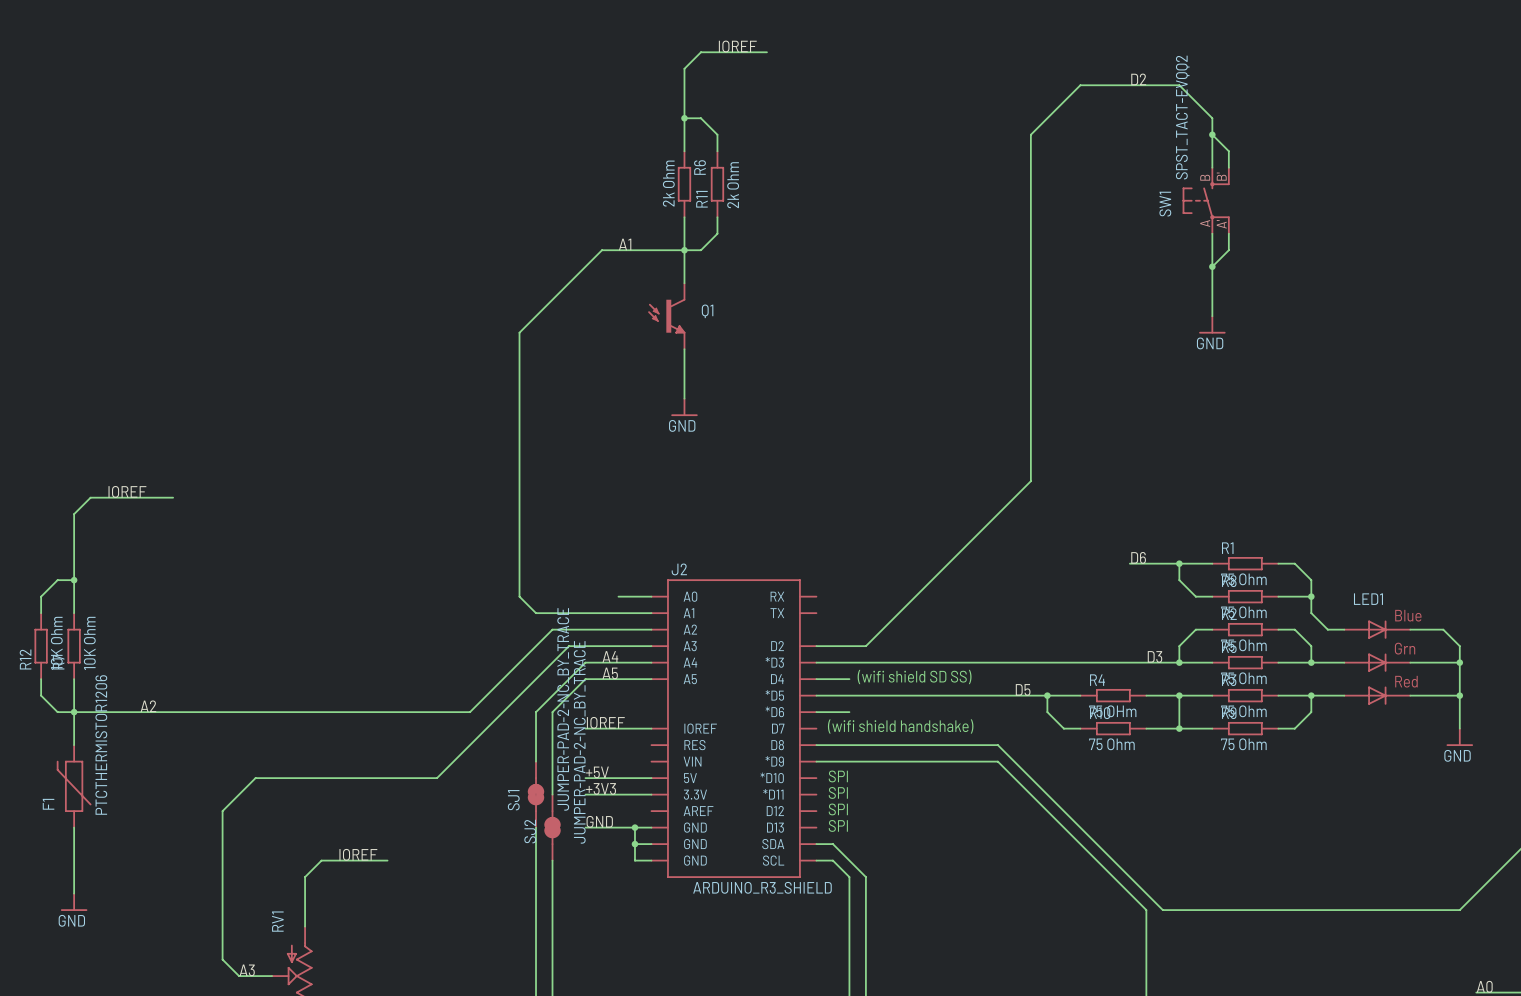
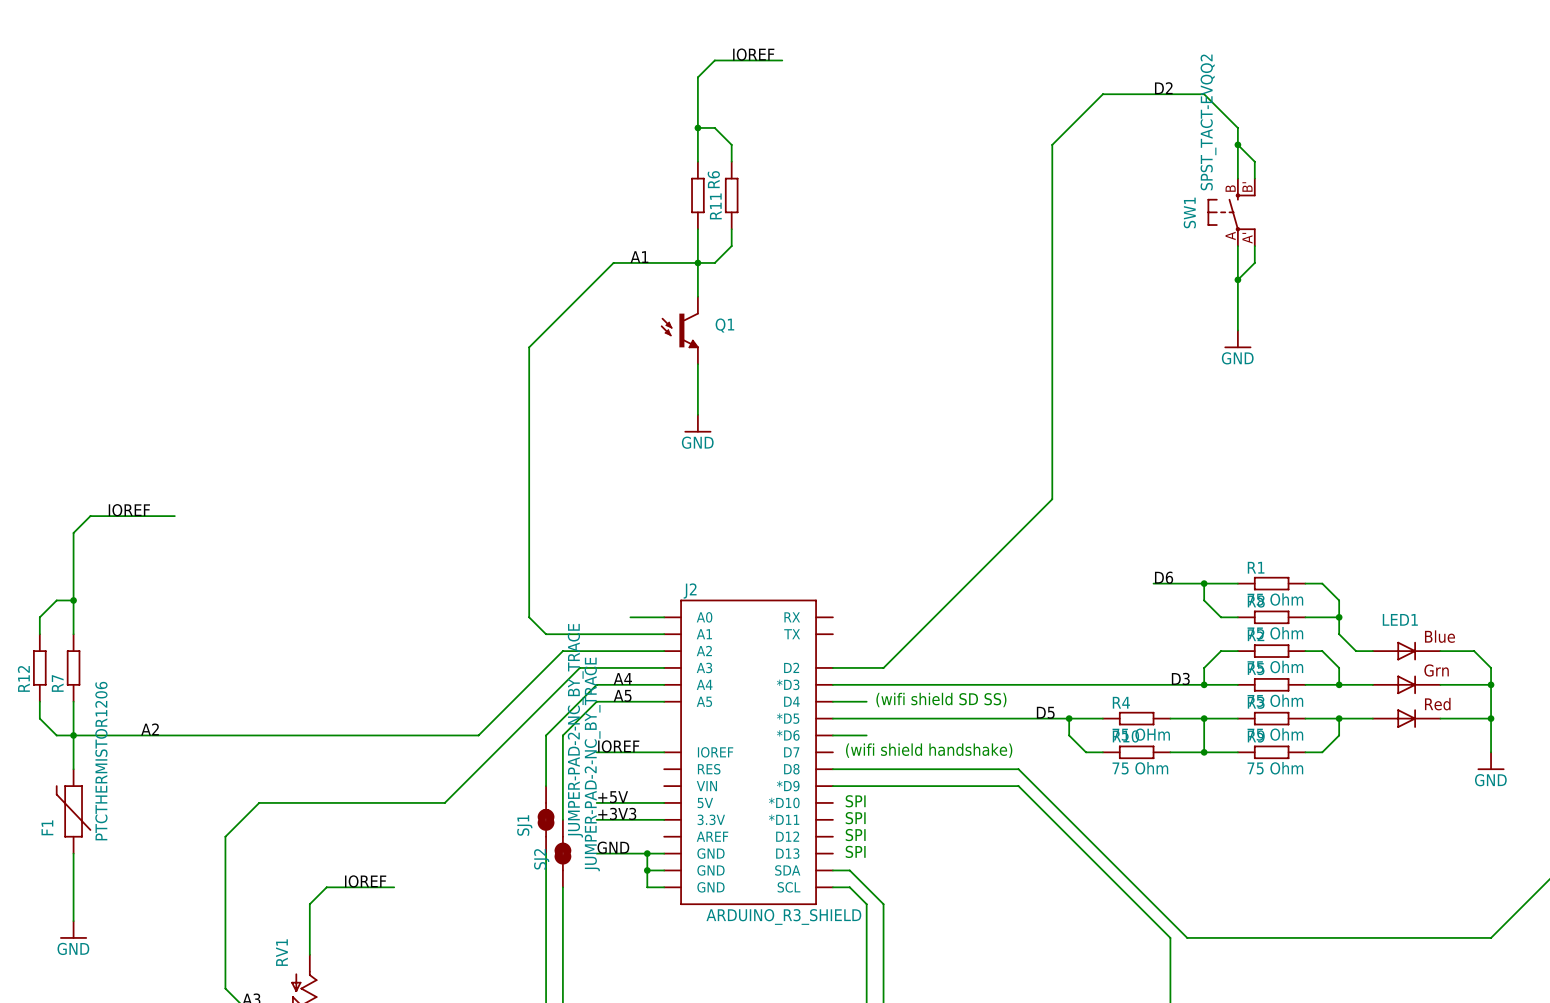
R6 value: 2k Ohm (668, 183) -> none
R11 value: 2k Ohm (733, 185) -> none
R12 value: 10K Ohm (56, 643) -> none
R7 value: 10K Ohm (89, 643) -> none

